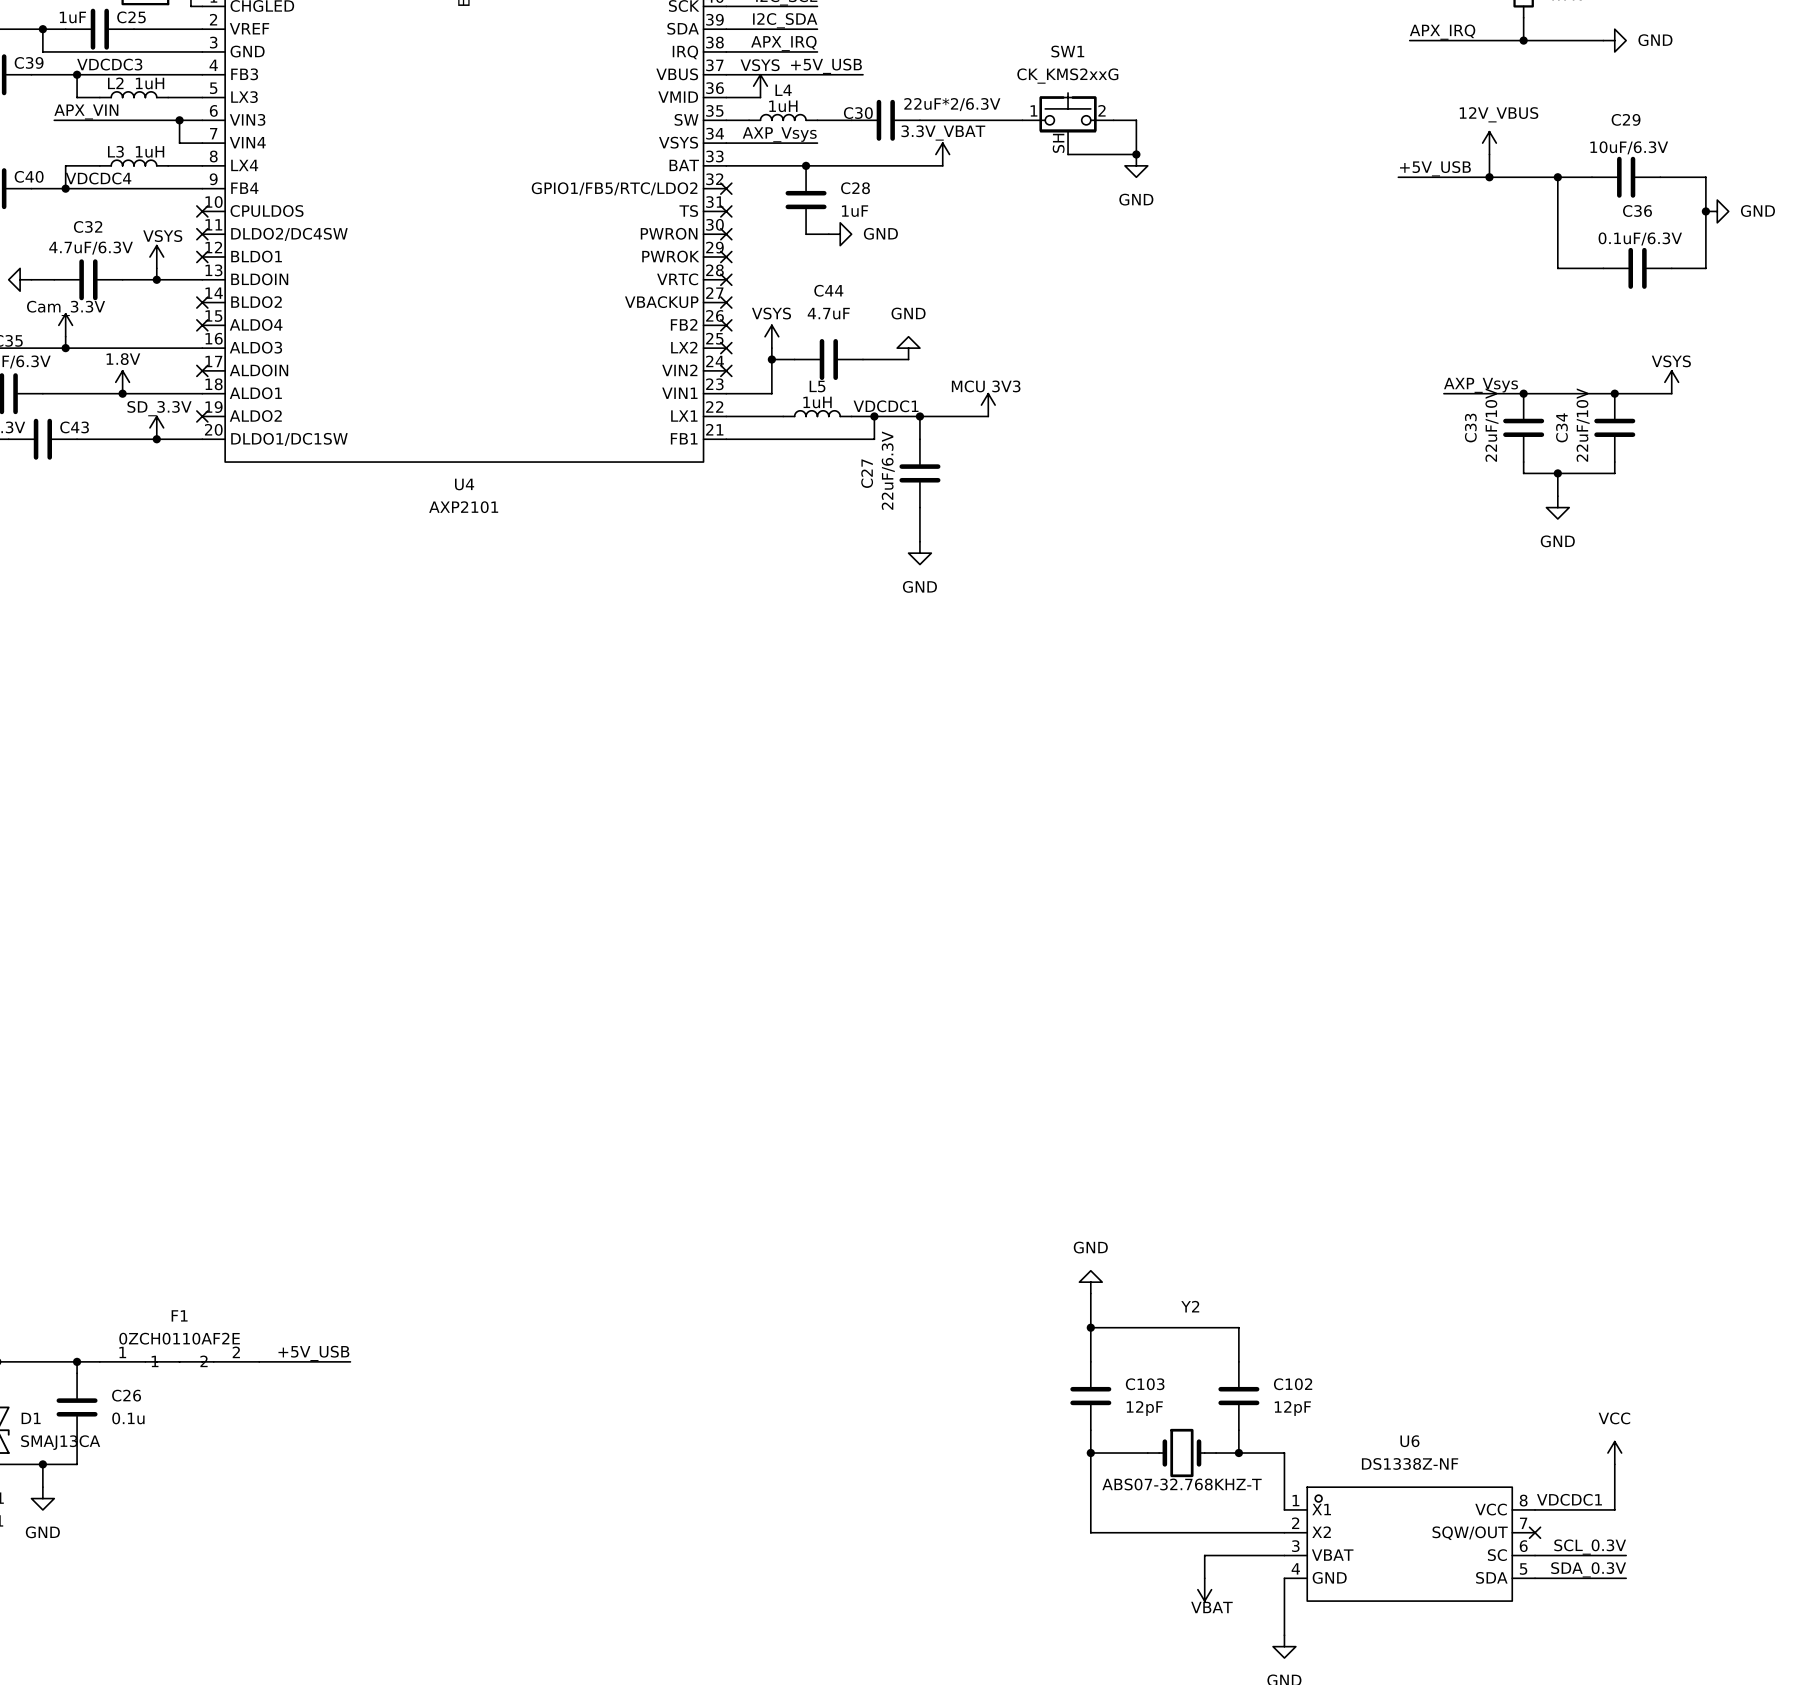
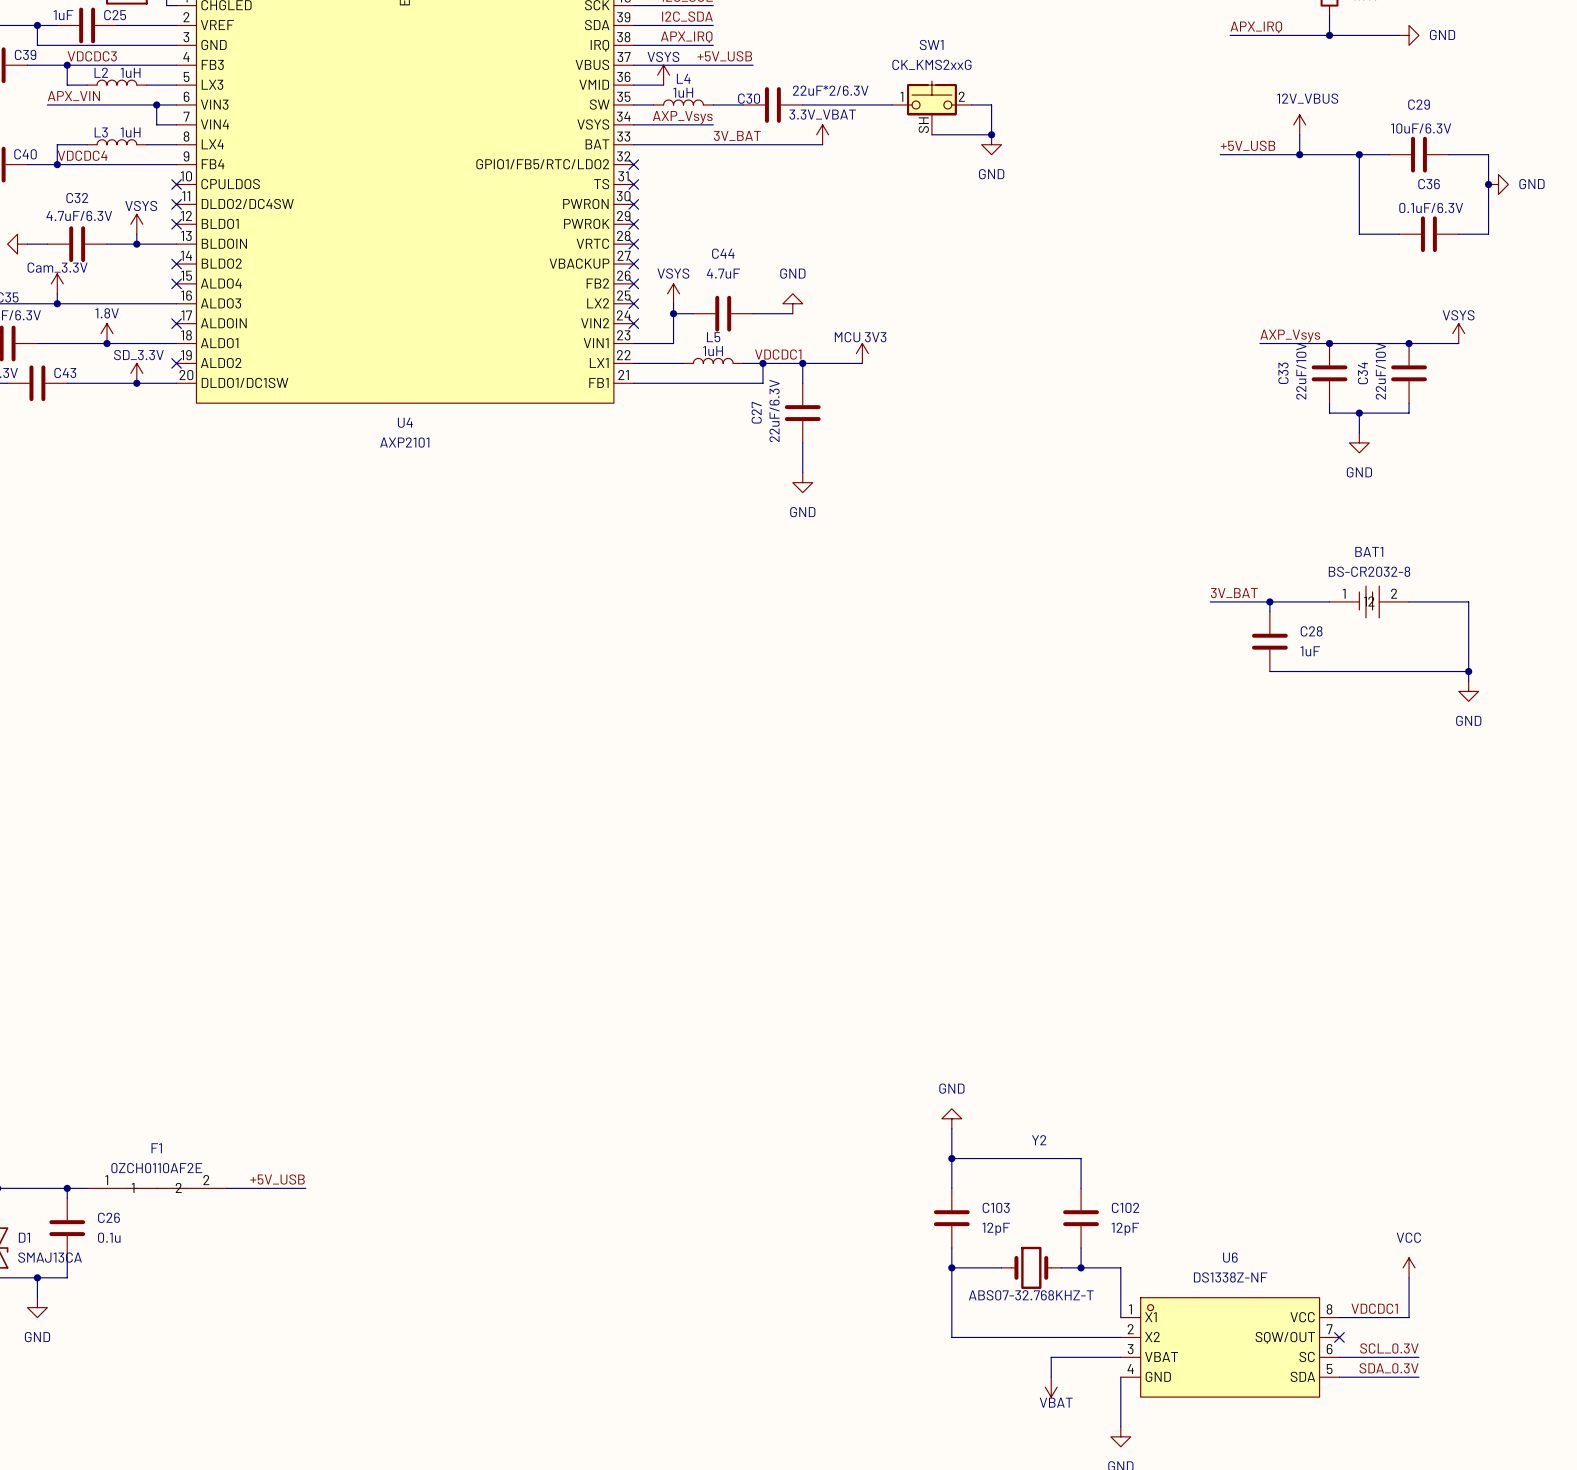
label: none -> 3V_BAT (737, 135)
junction: (806, 165) -> none
C28 position: (806, 200) -> (1269, 641)
wire: (806, 234) (828, 234) -> none
power symbol: GND (840, 234) -> none
label: none -> 3V_BAT (1234, 593)
wire: none -> (1210, 601) (1329, 601)
wire: none -> (1269, 601) (1269, 611)
junction: none -> (1269, 601)
BAT1: none -> BS-CR2032-8 (1369, 601)
wire: none -> (1409, 601) (1468, 601) (1468, 681)
wire: none -> (1269, 671) (1468, 671)
junction: none -> (1468, 671)
power symbol: none -> GND (1468, 691)

